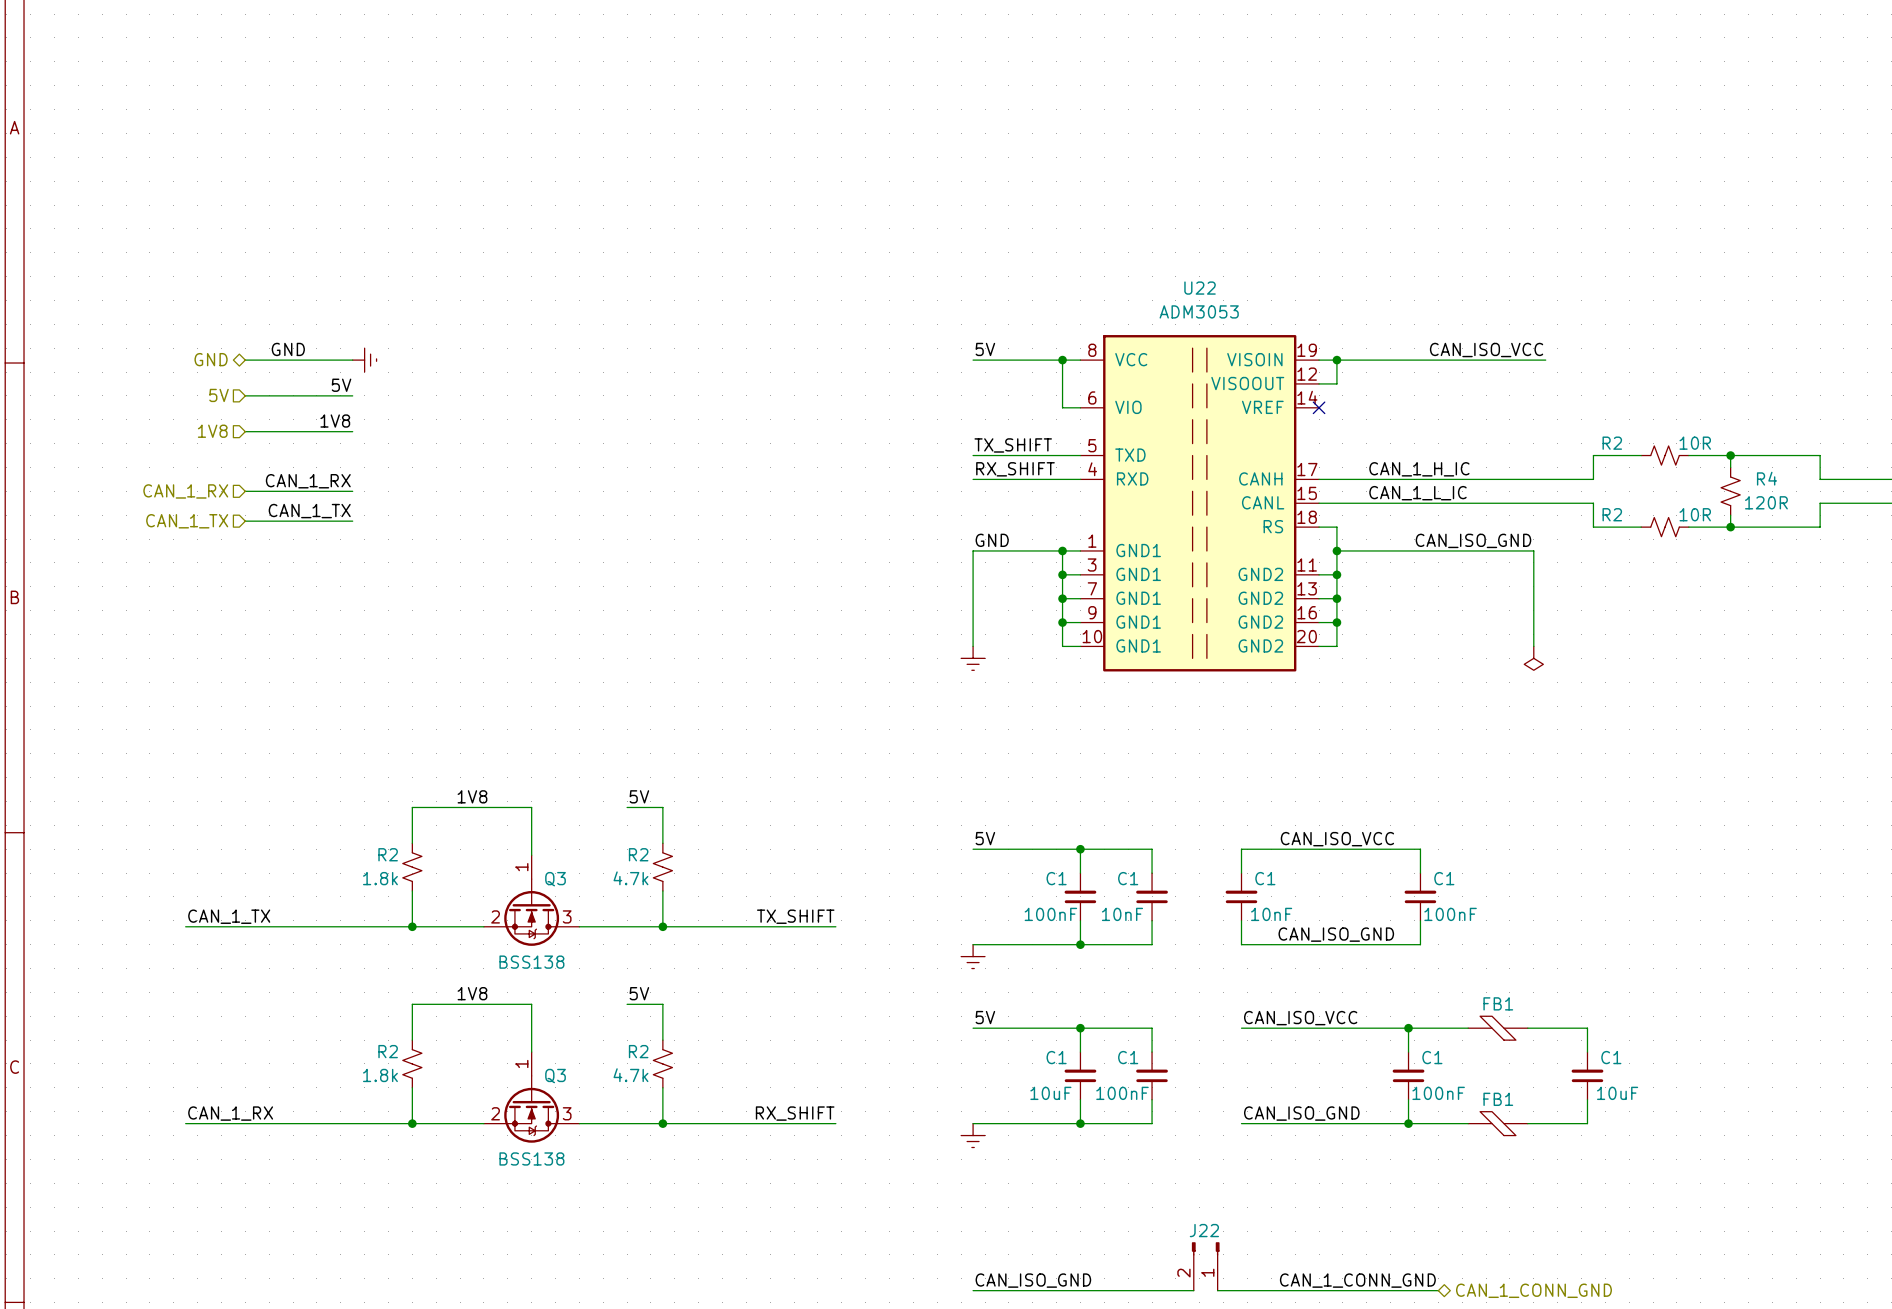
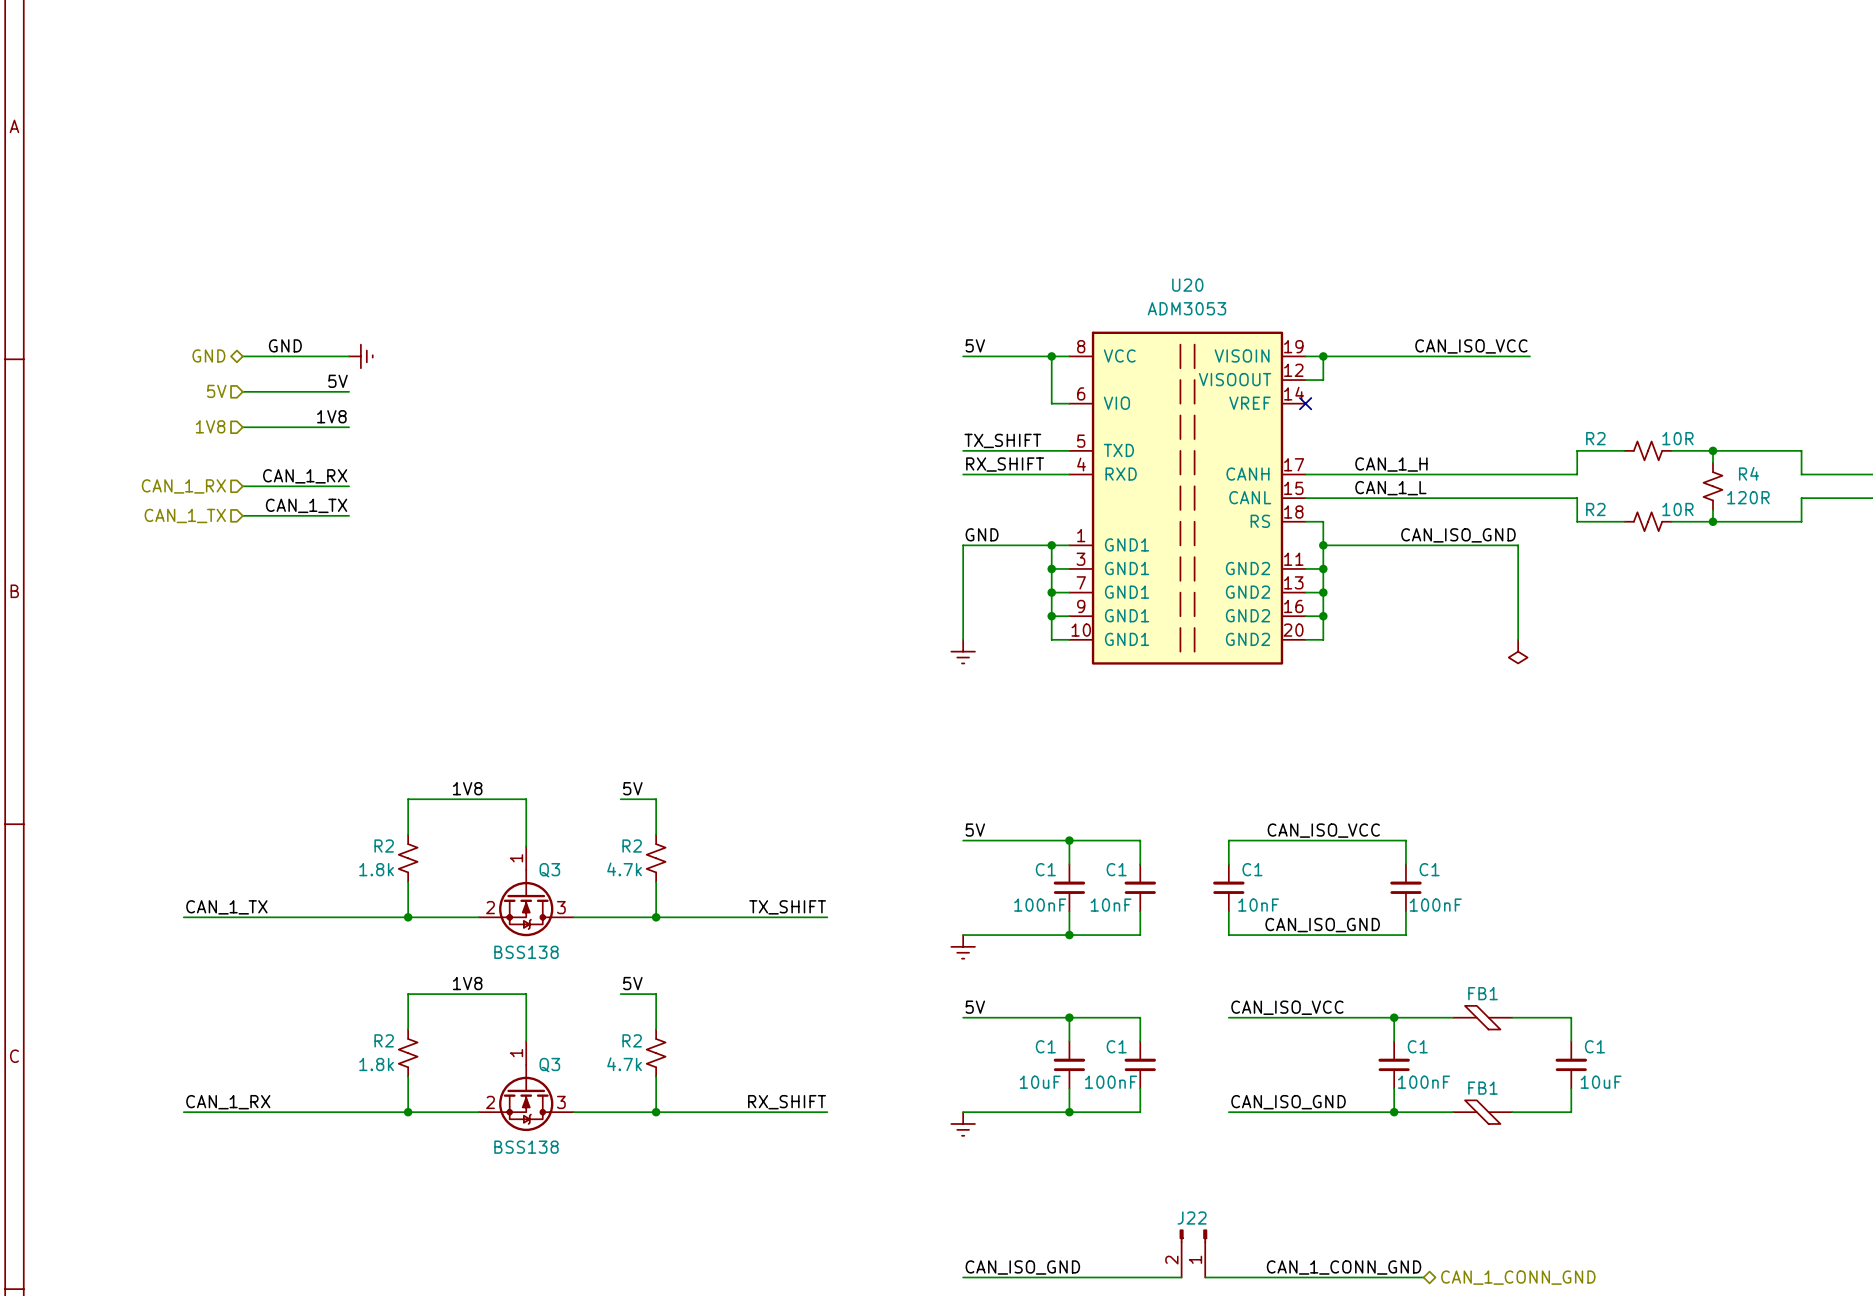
U22 name: U22 (1200, 288) -> U20 (1187, 285)
label: CAN_1_H_IC (1419, 469) -> CAN_1_H (1391, 464)
label: CAN_1_L_IC (1417, 493) -> CAN_1_L (1390, 488)

